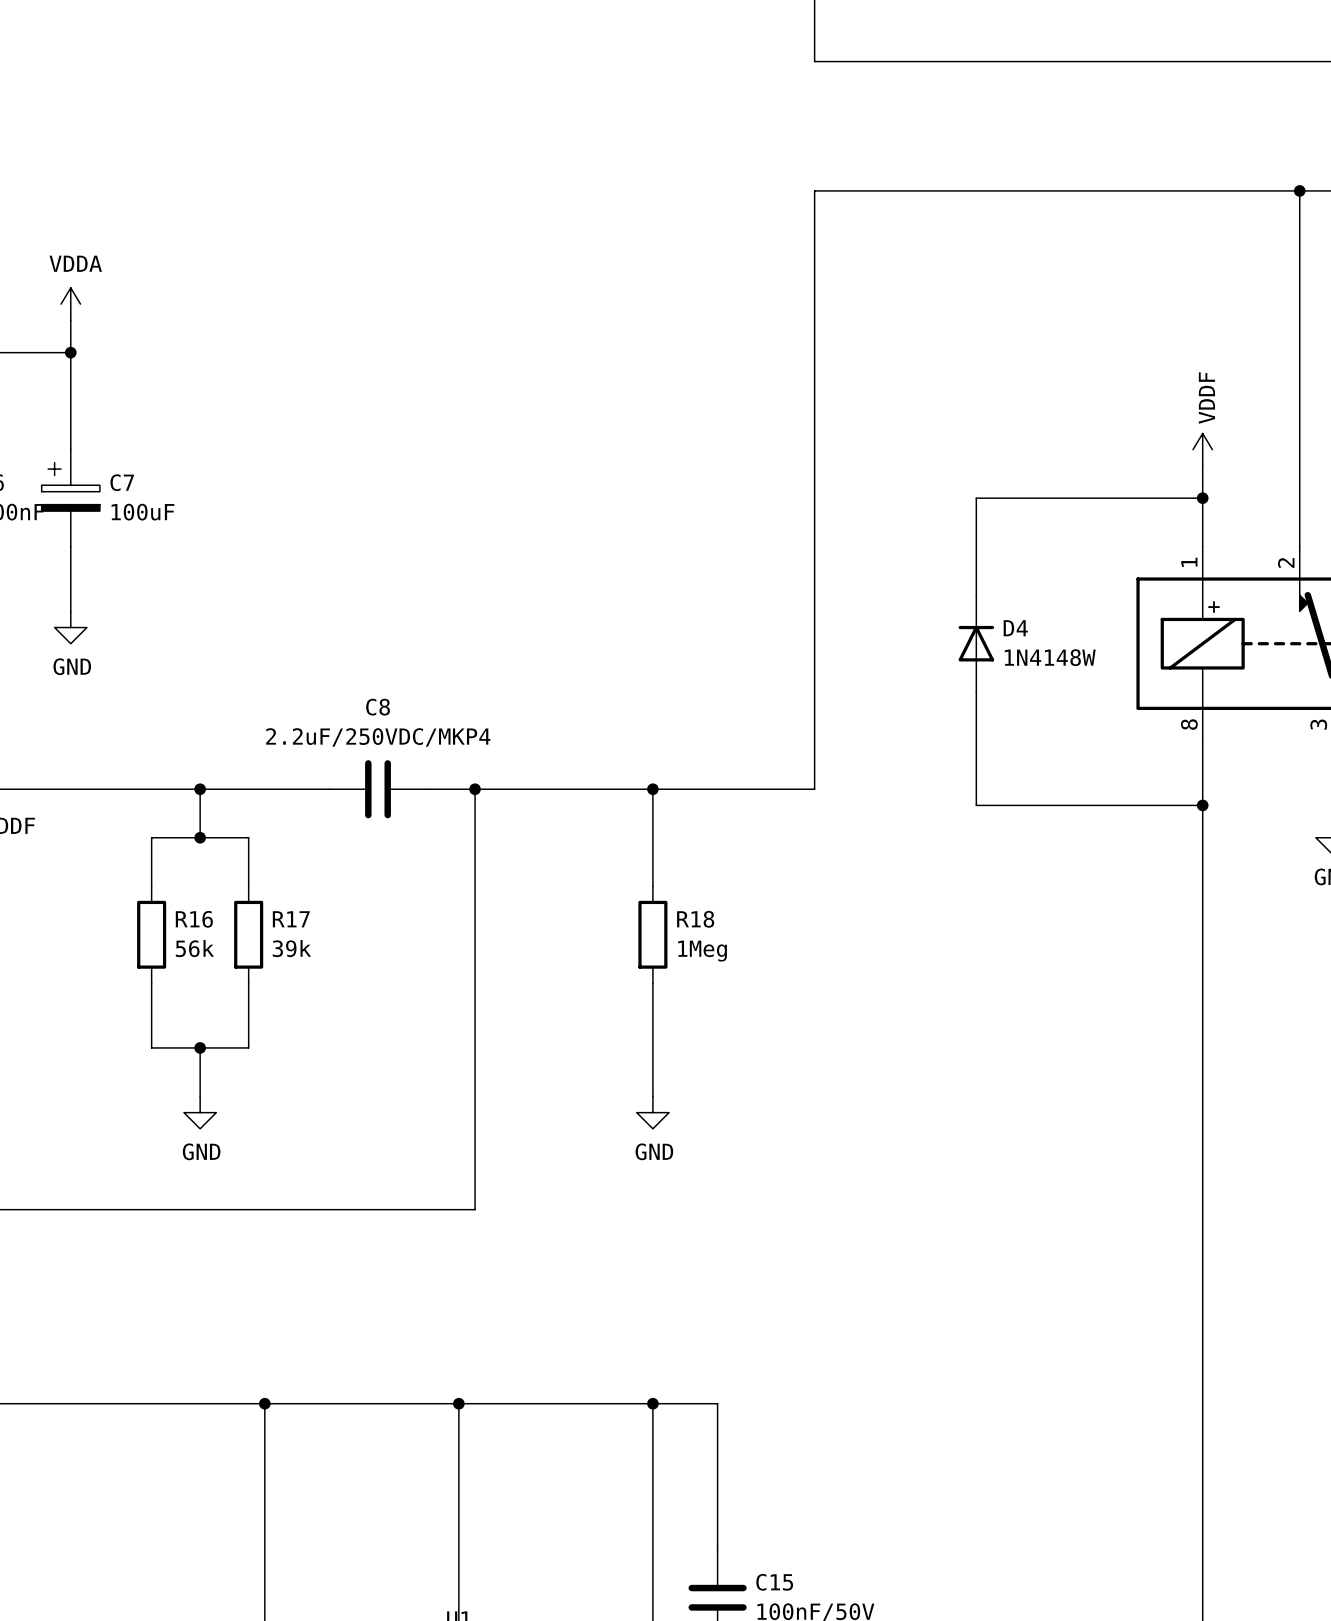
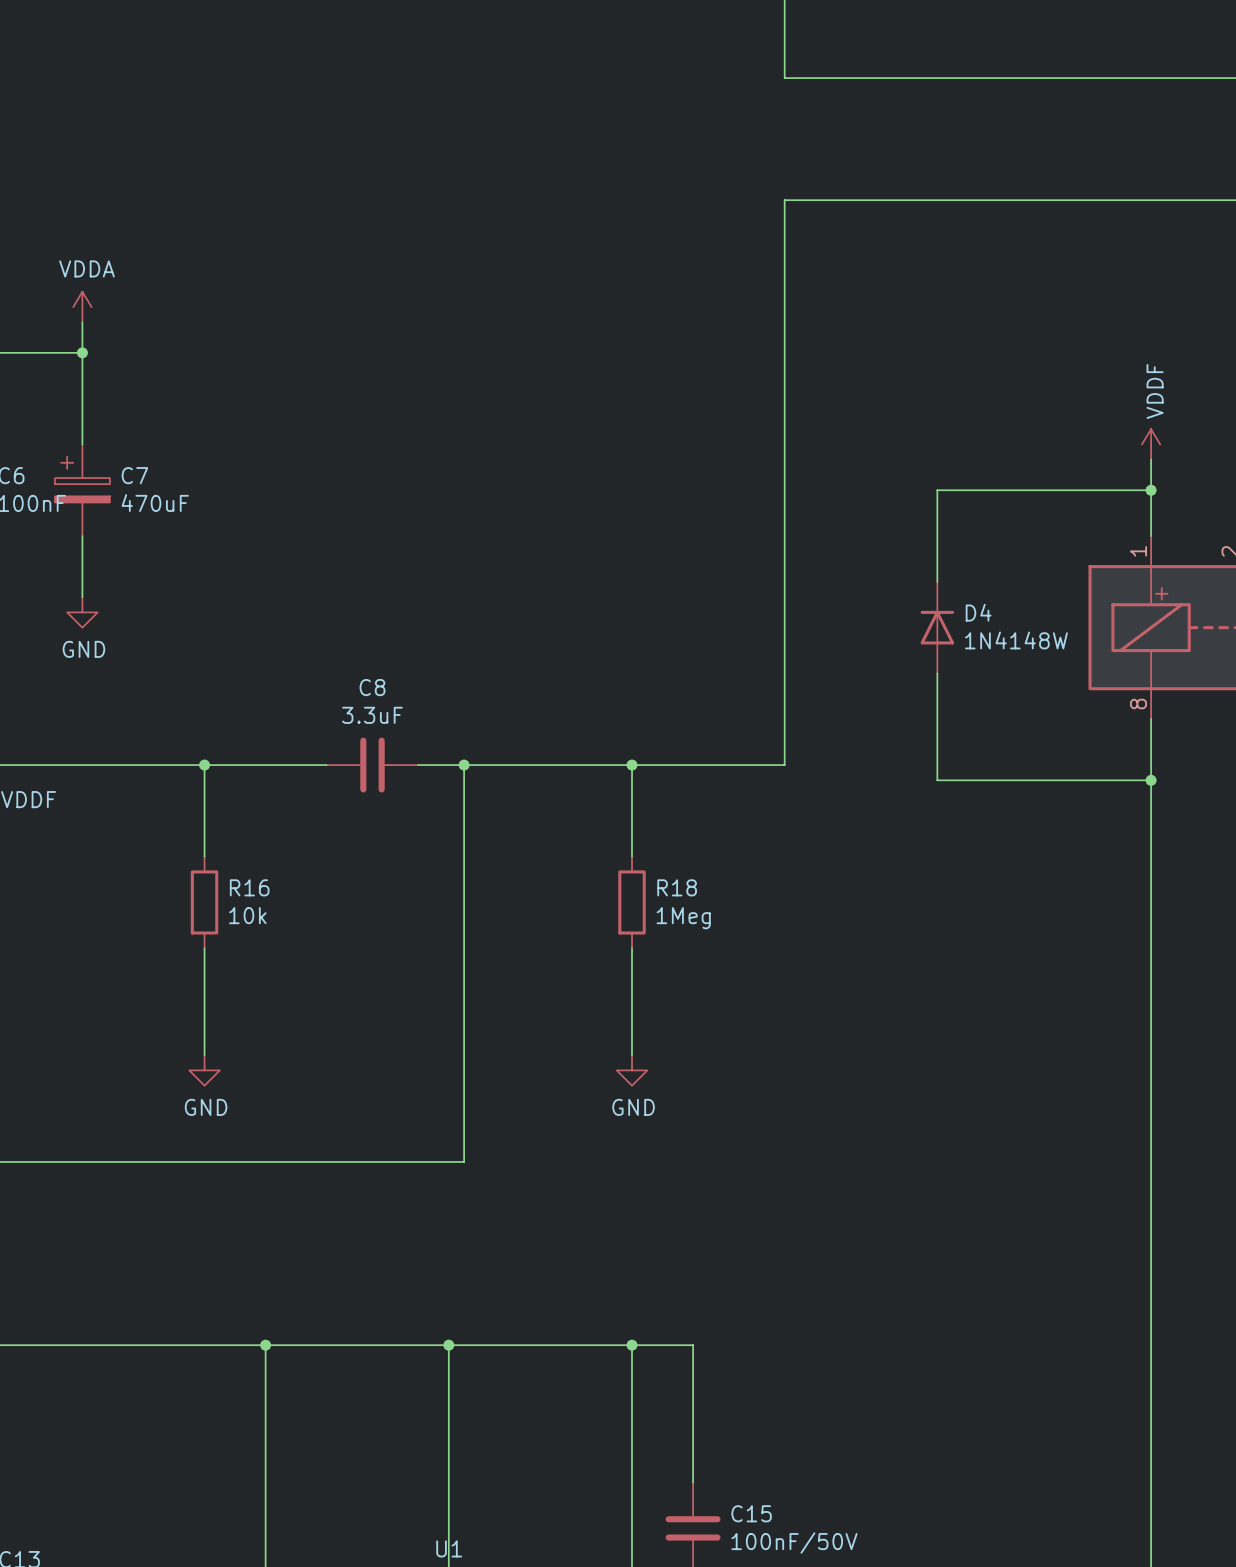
C7 value: 100uF (143, 512) -> 470uF (155, 503)
C8 value: 2.2uF/250VDC/MKP4 (378, 737) -> 3.3uF (372, 715)
wire: none -> (204, 810) (204, 856)
junction: (200, 837) -> none
wire: (151, 886) (151, 837) (248, 837) (248, 886) -> none
R16 position: (151, 934) -> (204, 902)
R17: 39k (248, 934) -> none
R16 value: 56k (194, 948) -> 10k (247, 915)
wire: (151, 983) (151, 1047) (248, 1047) (248, 983) -> none
wire: none -> (204, 948) (204, 1009)
junction: (200, 1047) -> none

